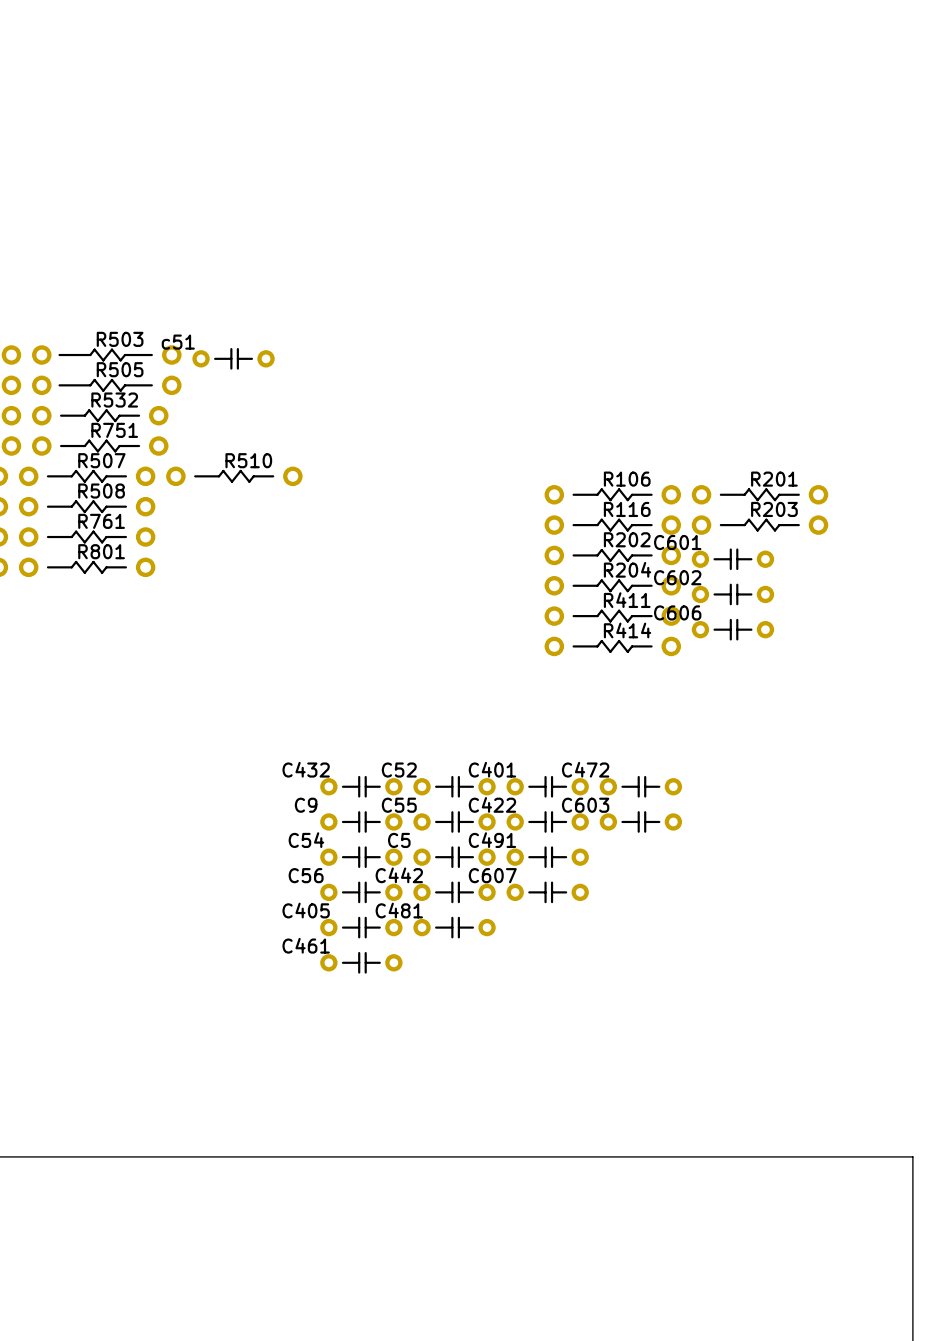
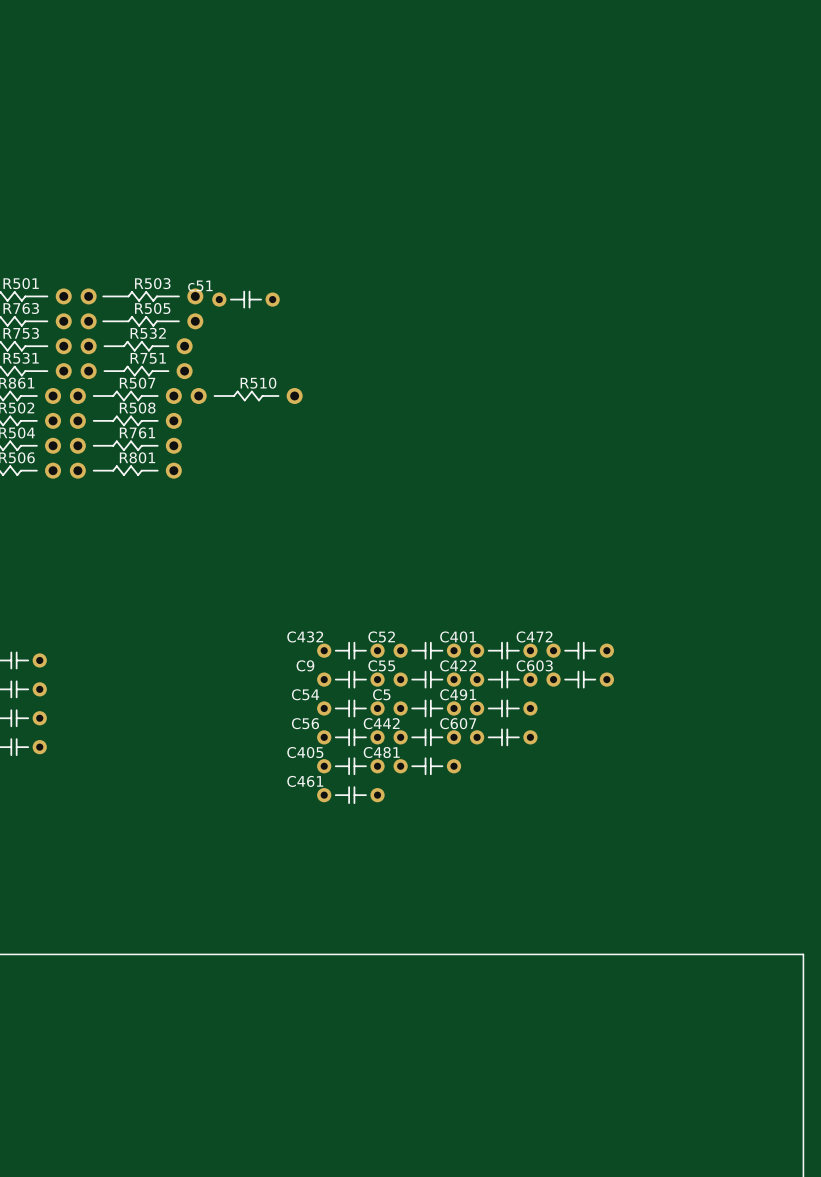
R106: (612, 494) -> none
R201: (760, 494) -> none
R116: (612, 525) -> none
R203: (760, 525) -> none
R202: (612, 555) -> none
C601: (732, 559) -> none
R204: (612, 585) -> none
C602: (732, 594) -> none
R411: (612, 616) -> none
C606: (732, 629) -> none
R414: (612, 646) -> none

